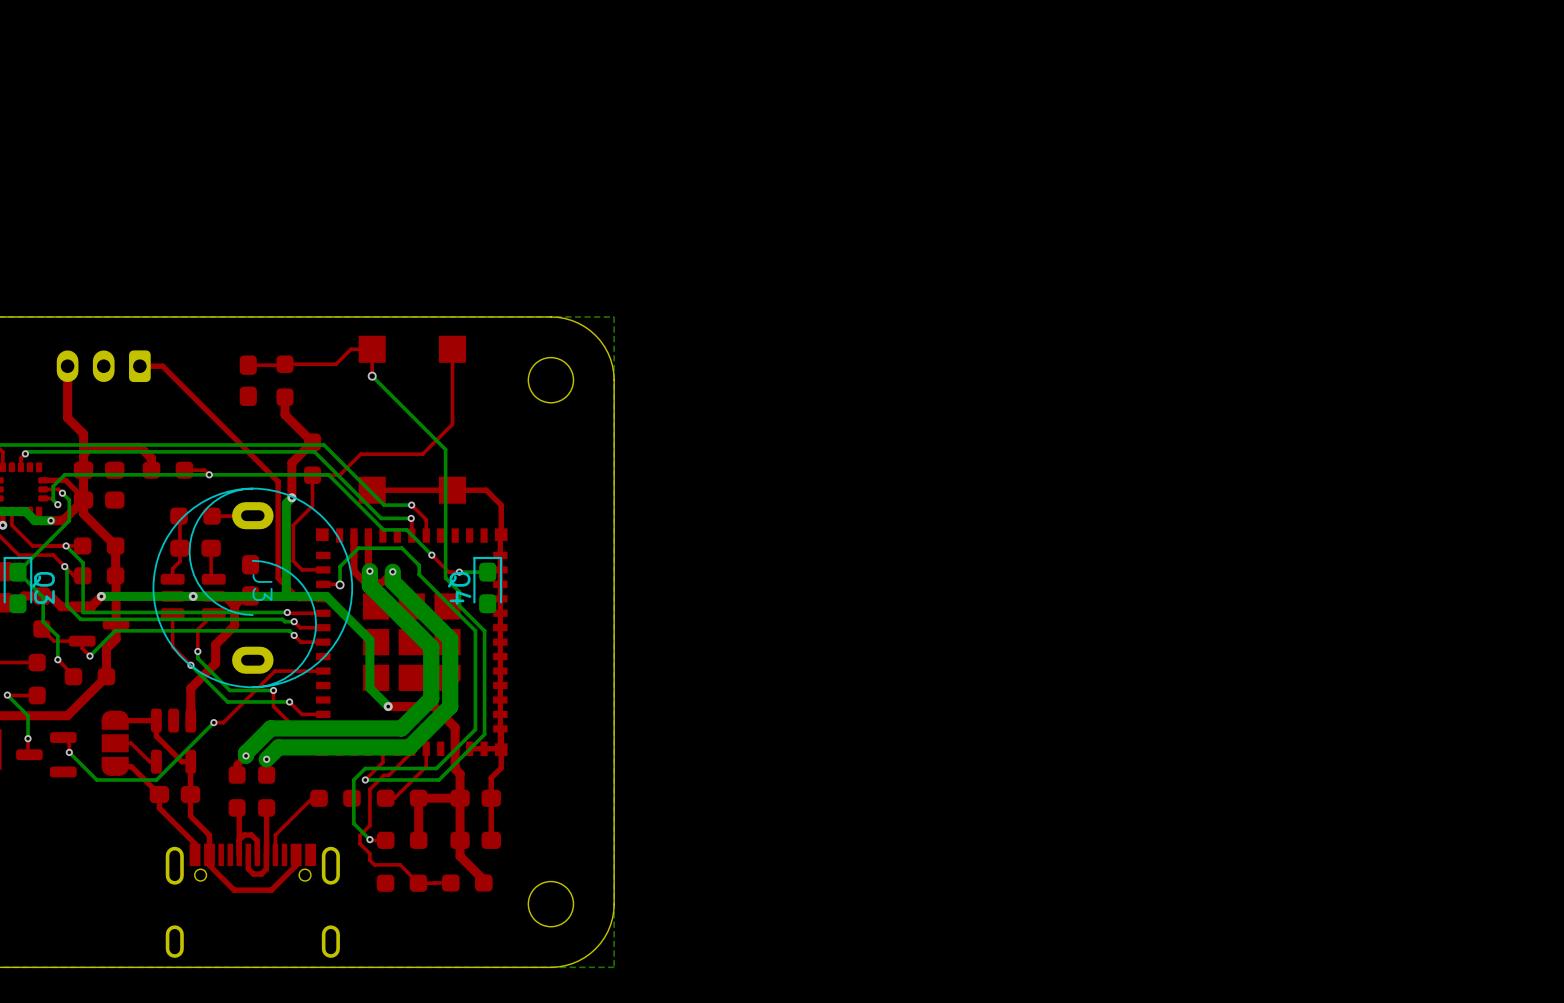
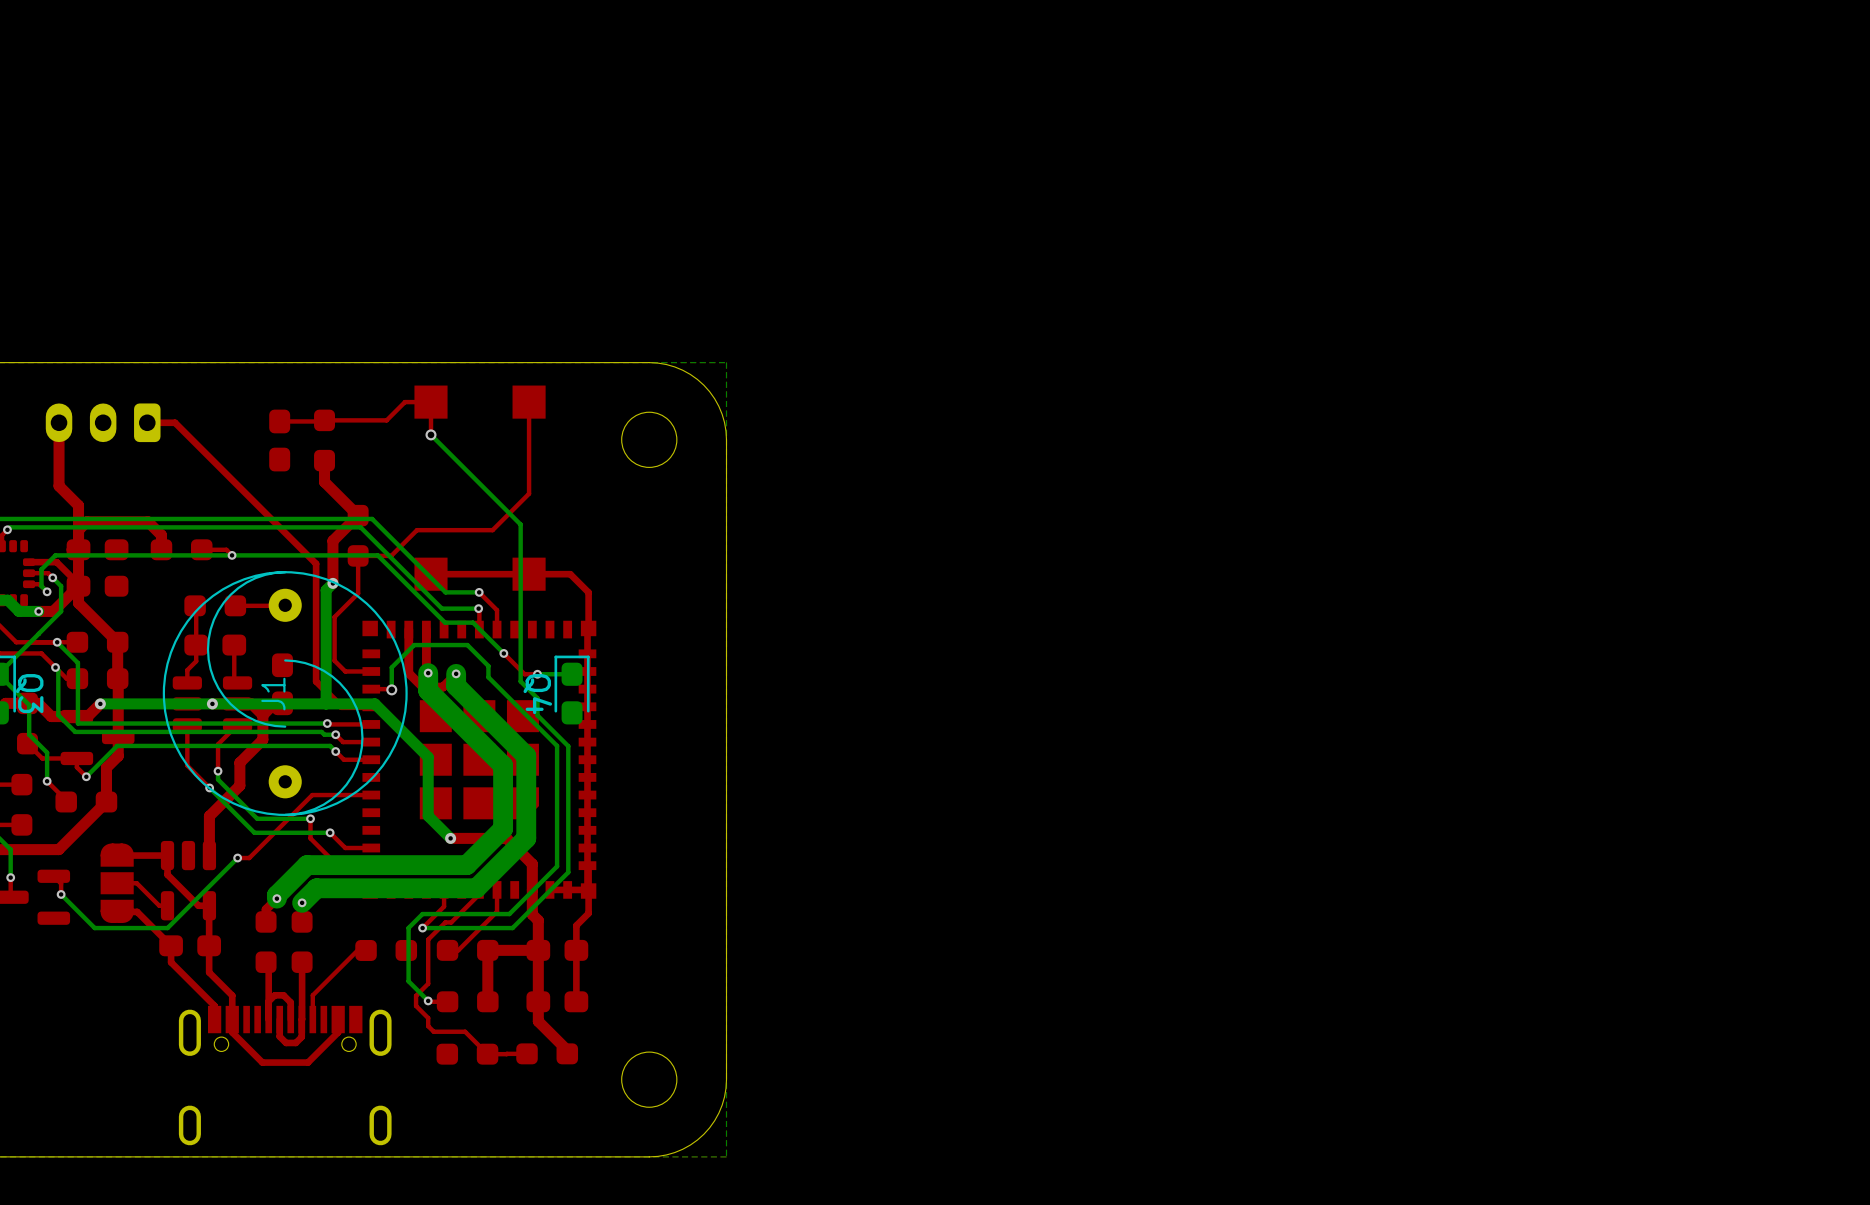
J3: (252, 587) -> none
J1: none -> (285, 693)

